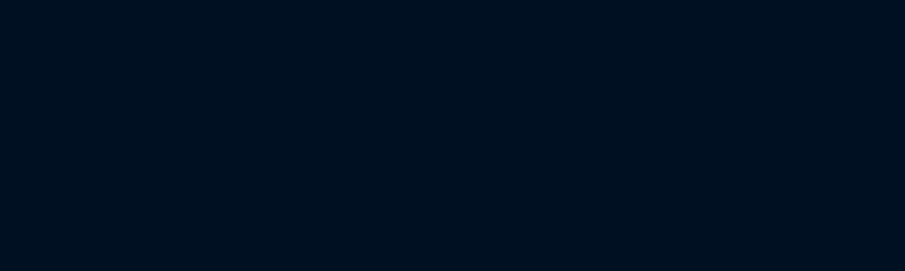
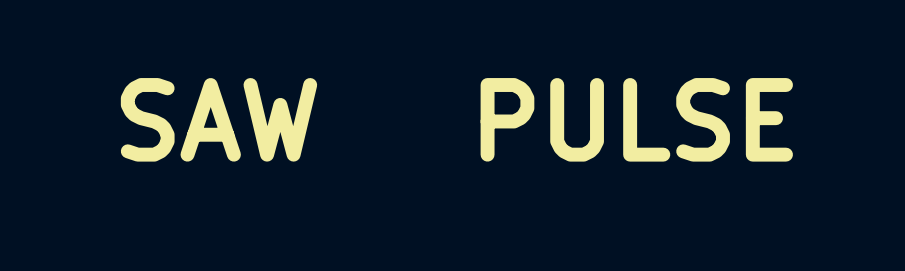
text: none -> SAW (219, 119)
text: none -> PULSE (636, 119)

